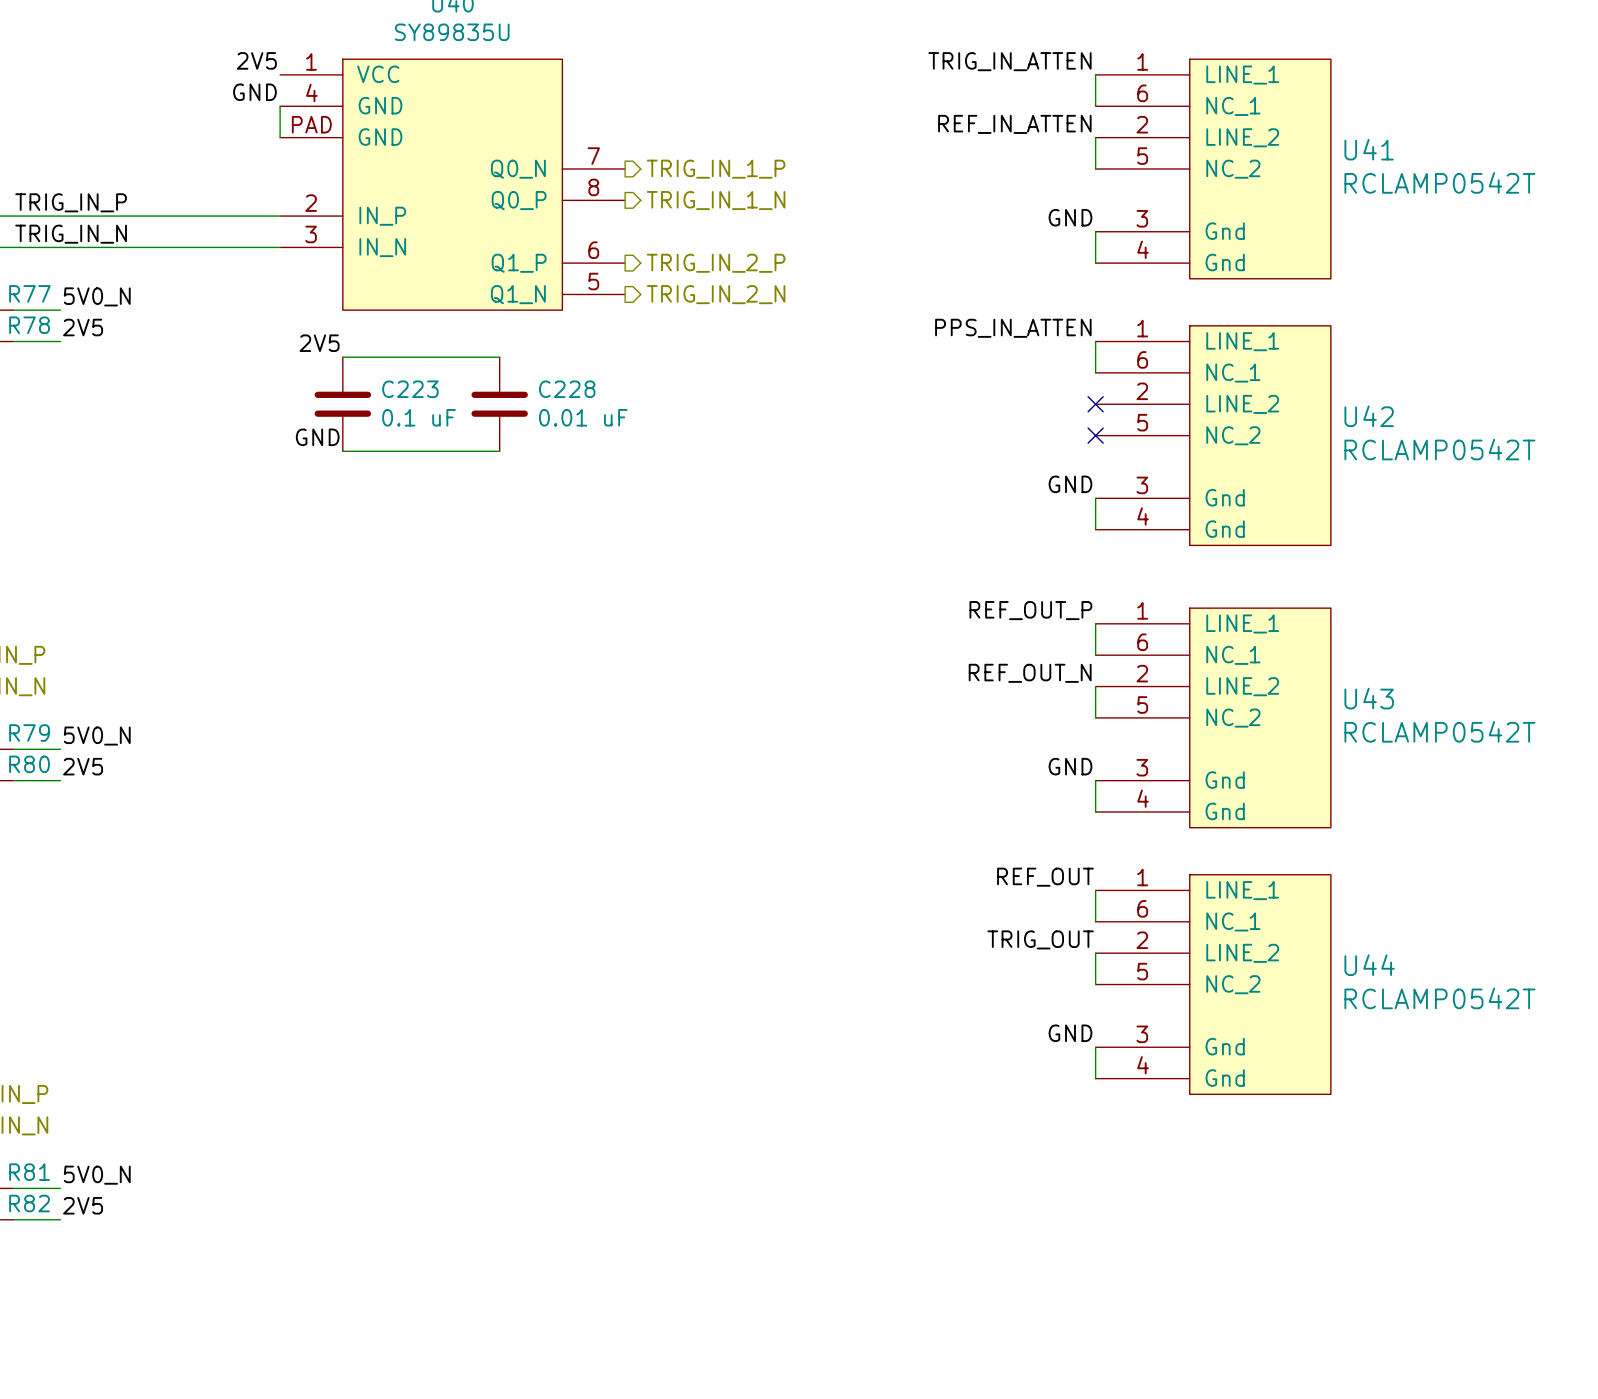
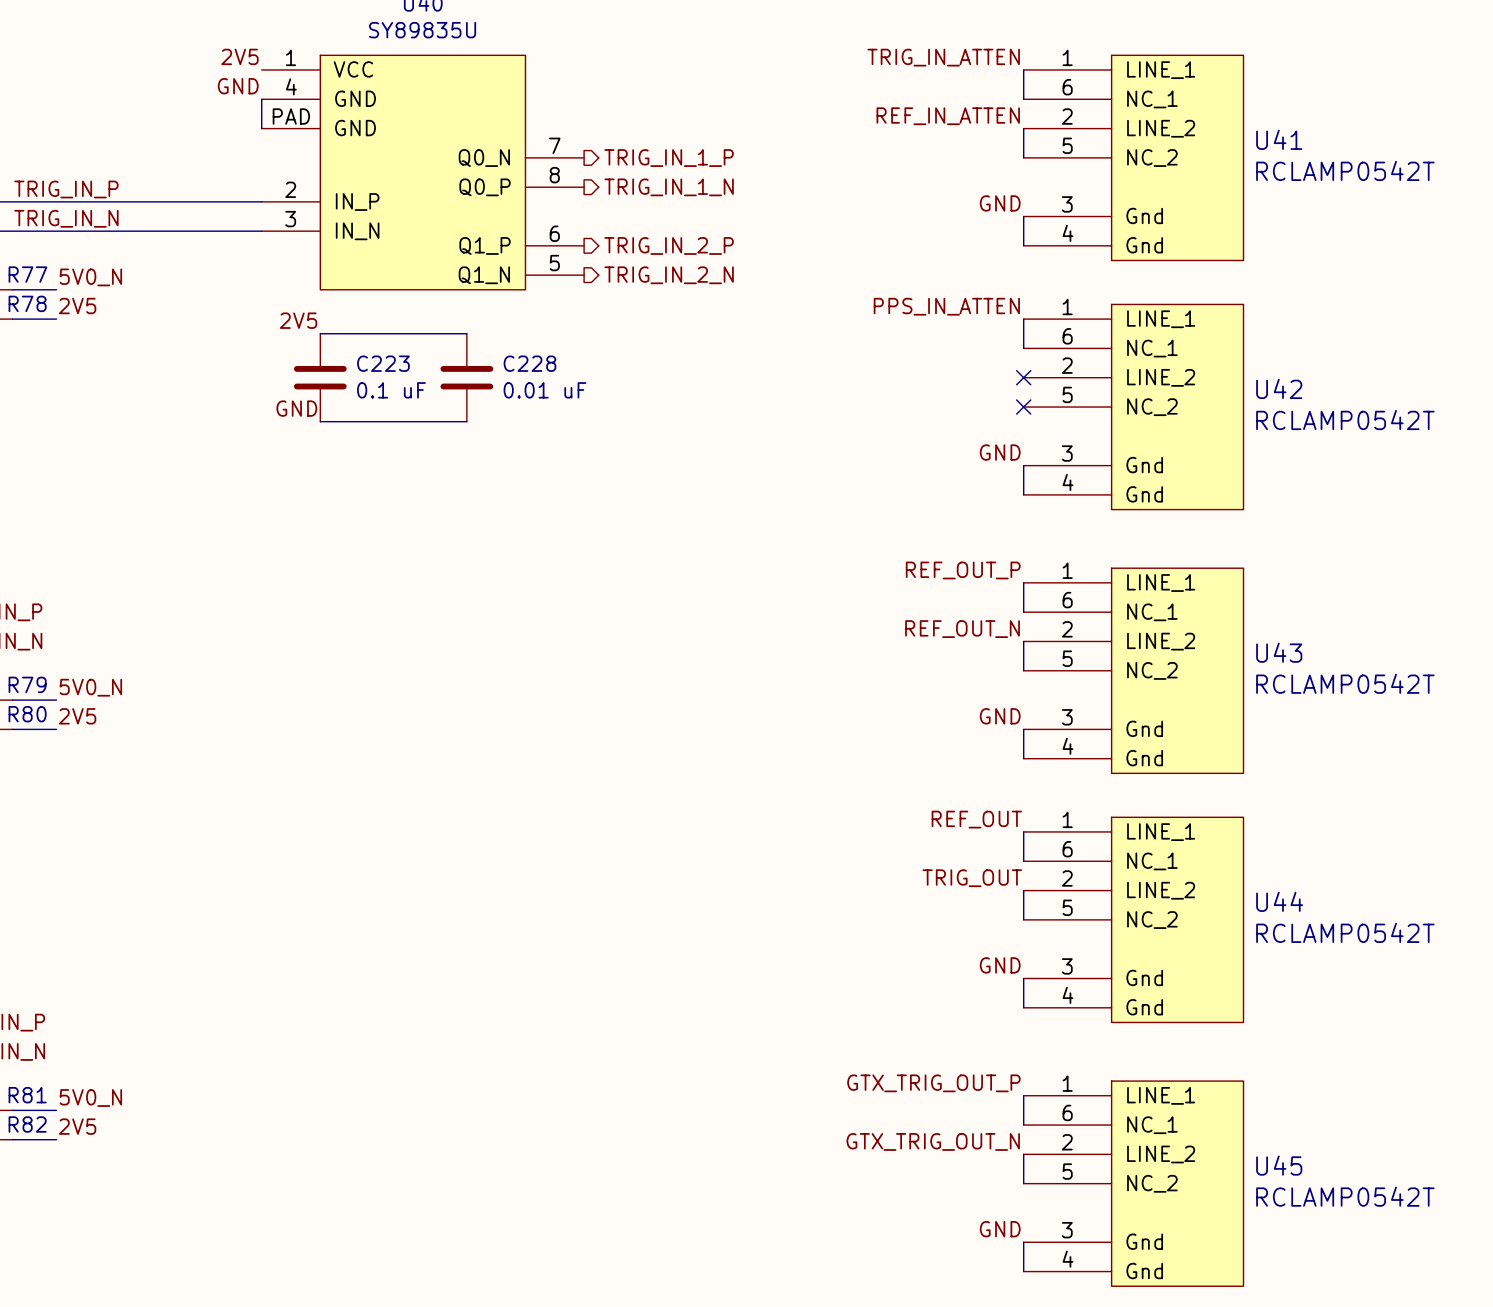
label: none -> GTX_TRIG_OUT_P (933, 1083)
wire: none -> (1023, 1095) (1023, 1125)
label: none -> GTX_TRIG_OUT_N (933, 1141)
wire: none -> (1023, 1154) (1023, 1183)
U45: none -> RCLAMP0542T (1133, 1183)
label: none -> GND (1000, 1229)
wire: none -> (1023, 1242) (1023, 1271)

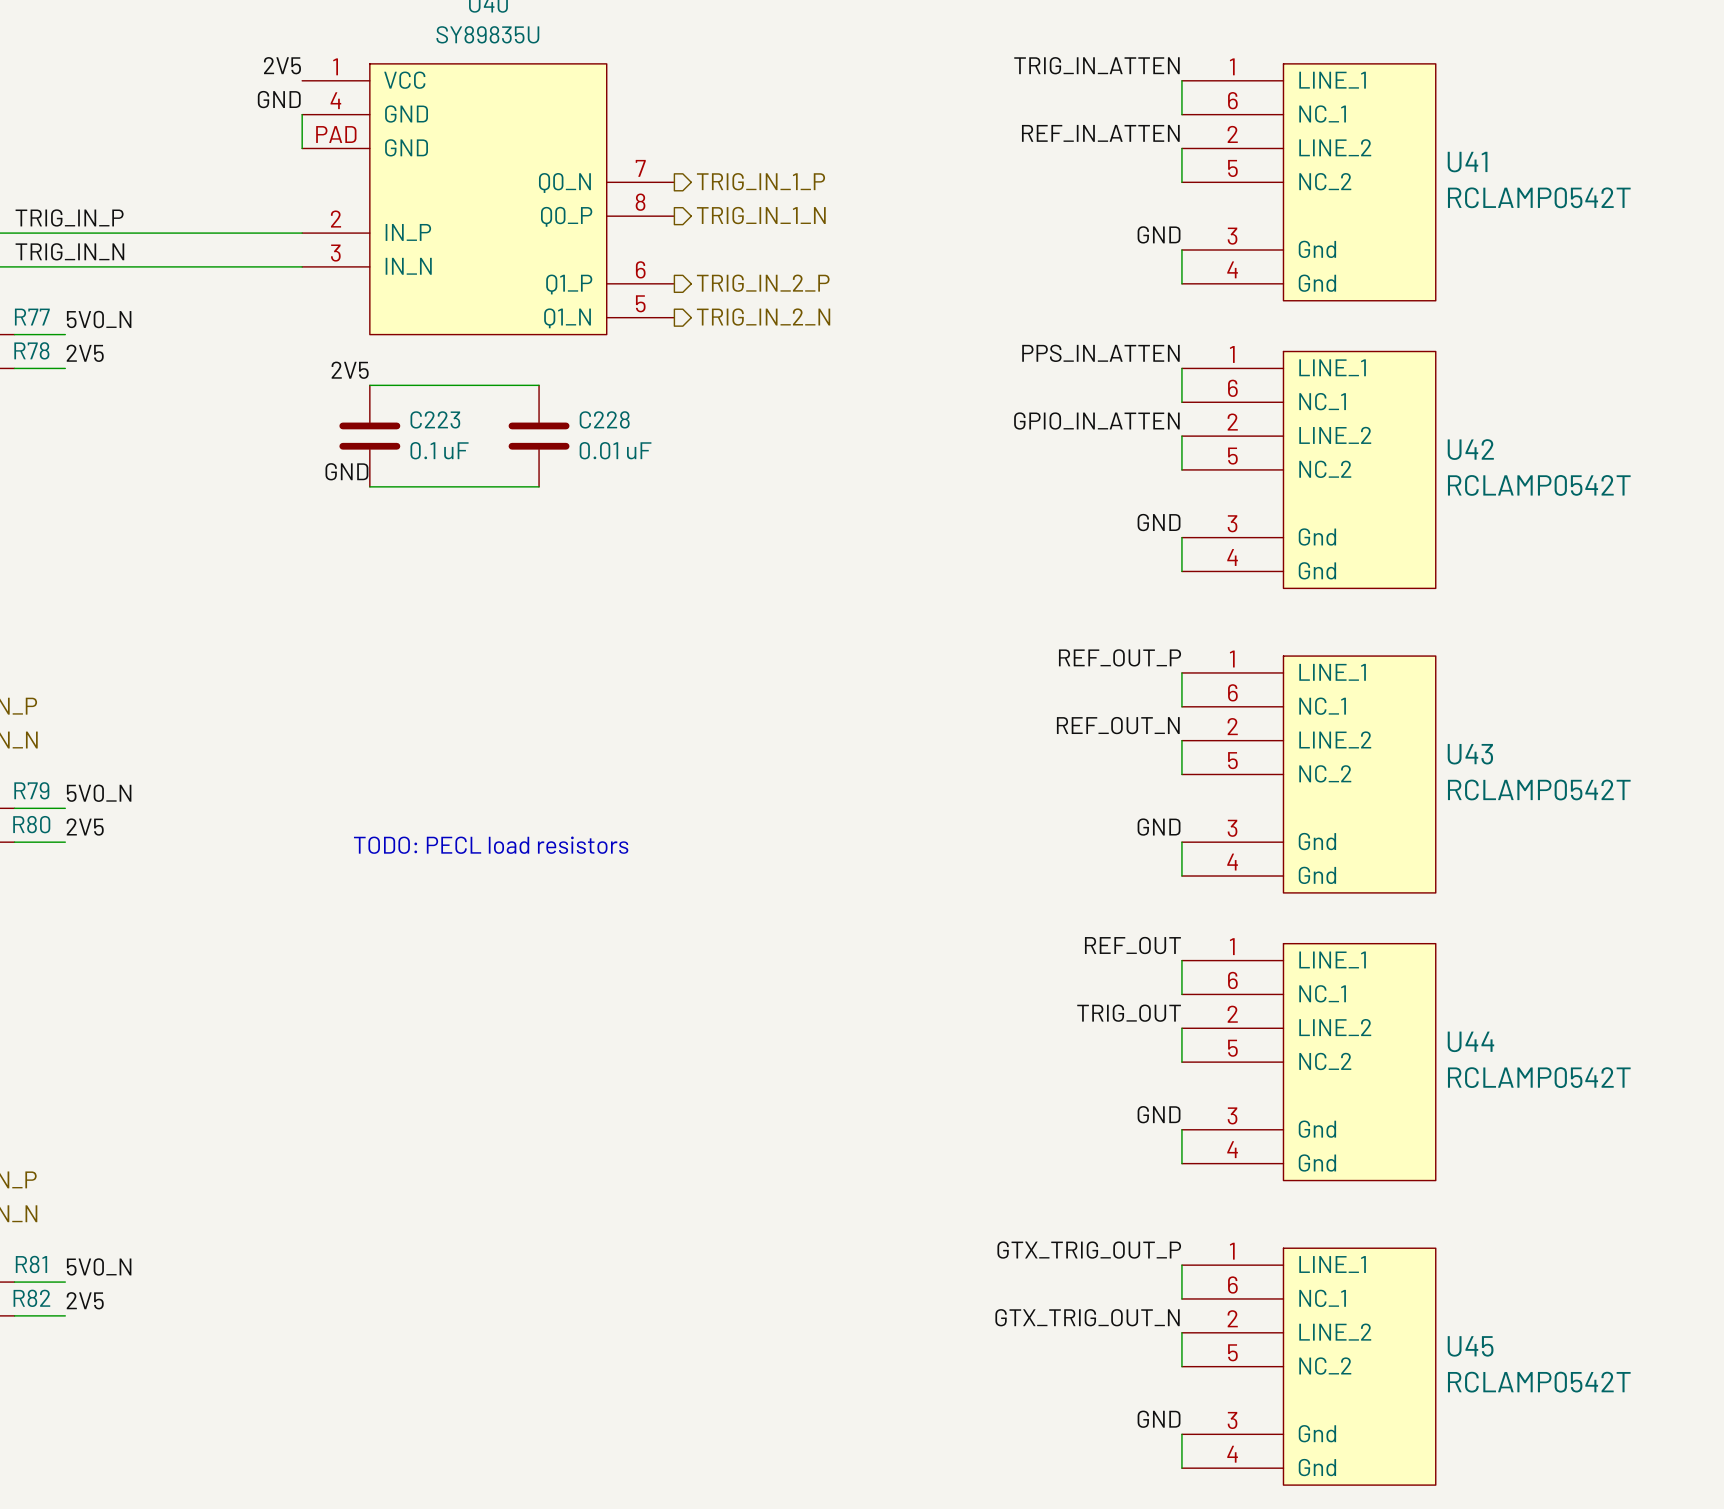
label: none -> GPIO_IN_ATTEN (1096, 421)
wire: none -> (1181, 436) (1181, 469)
no-connect mark: (1023, 377) -> none
no-connect mark: (1023, 407) -> none
text: none -> TODO: PECL load resistors (491, 845)

